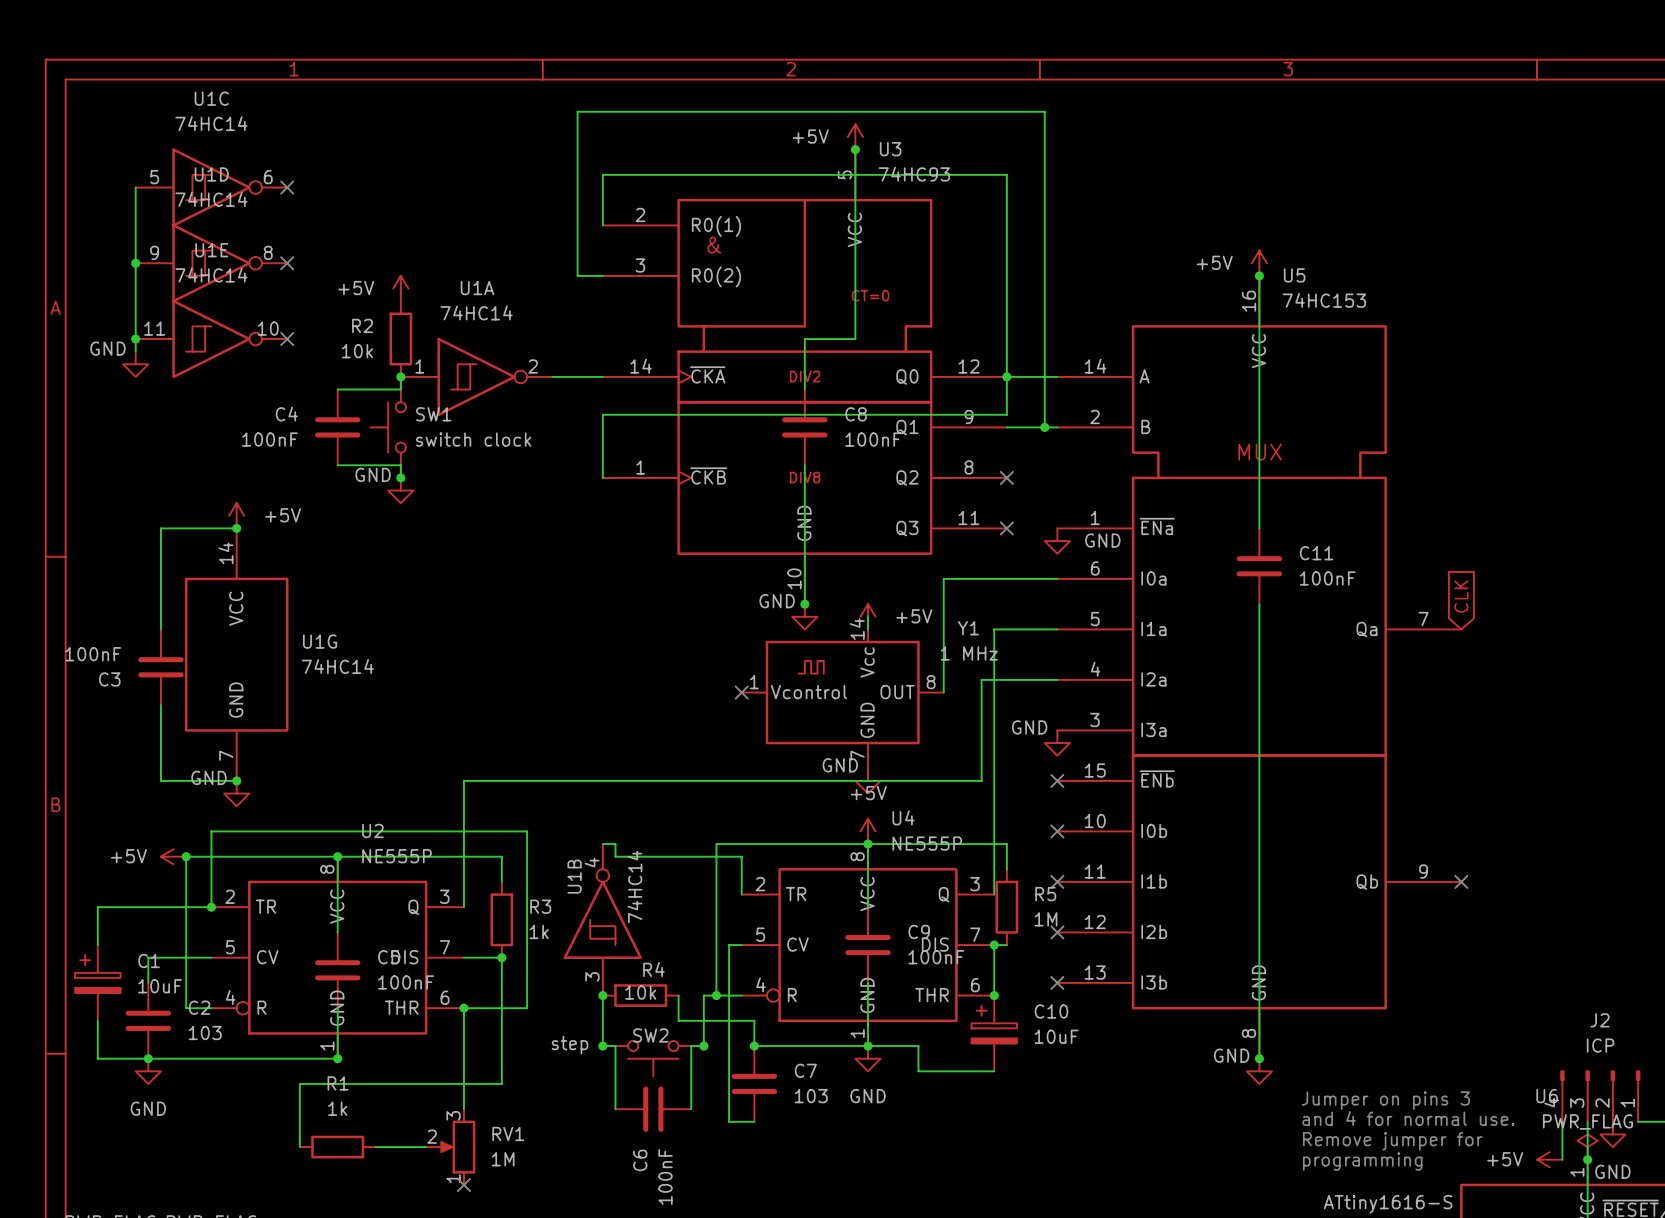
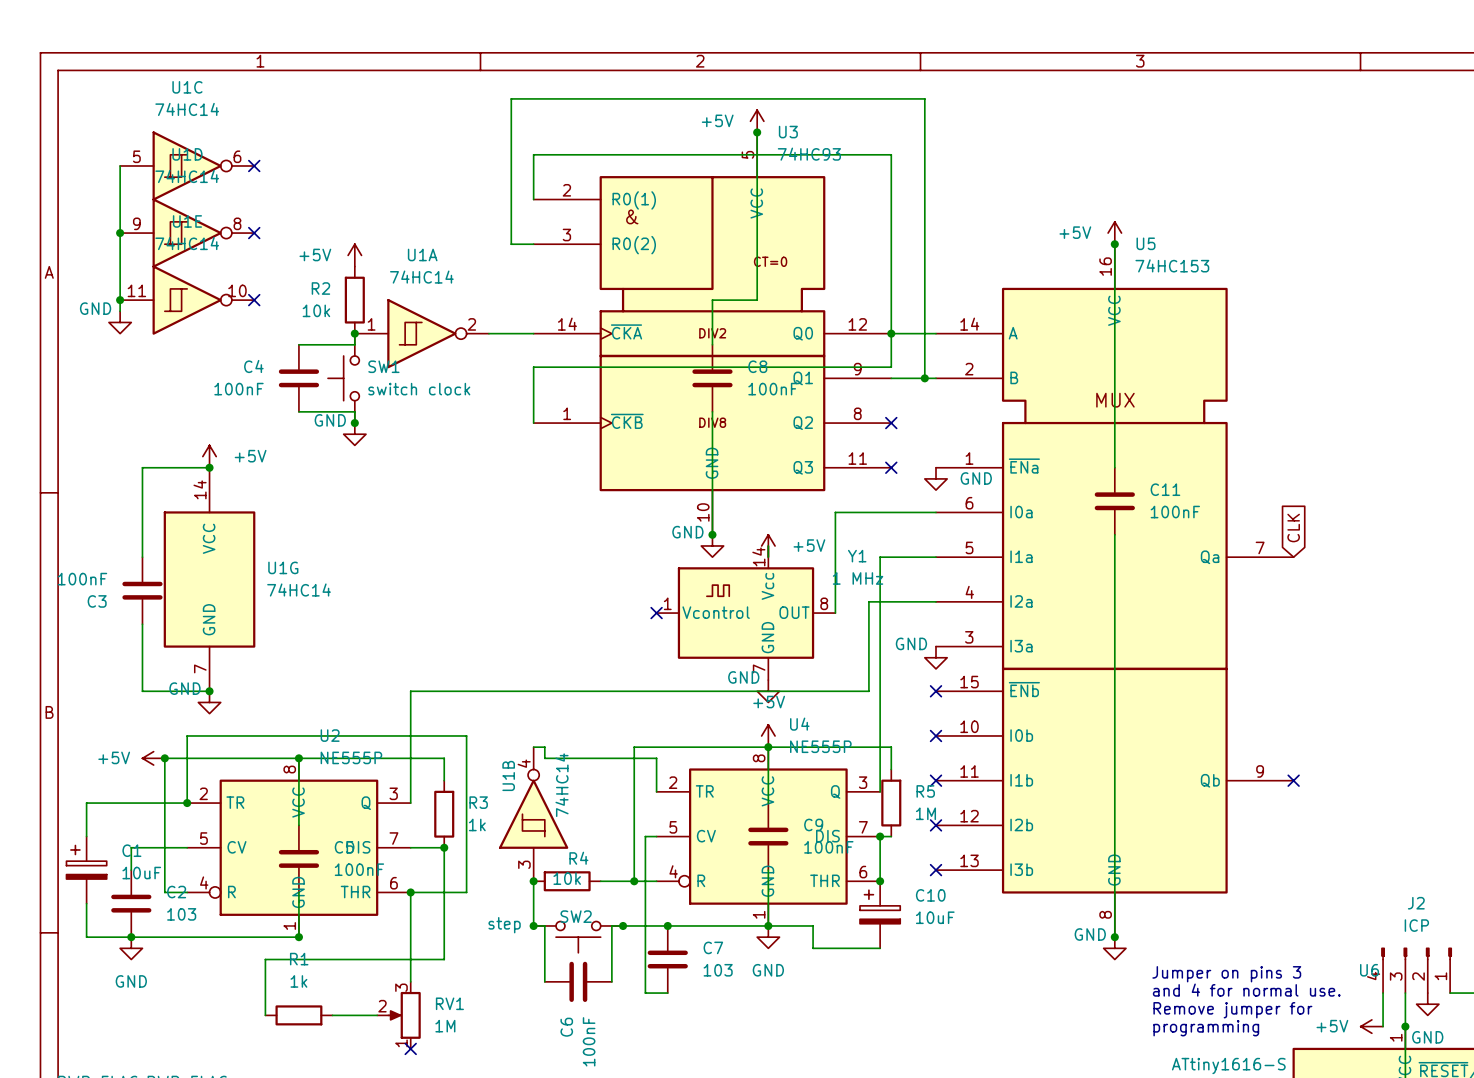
wire: (678, 995) (678, 1020) (754, 1020) (754, 1046) -> (623, 925) (667, 925)
wire: (703, 995) (703, 1046) -> (623, 881) (600, 881)
power symbol: PWR_FLAG (1587, 1147) -> none

